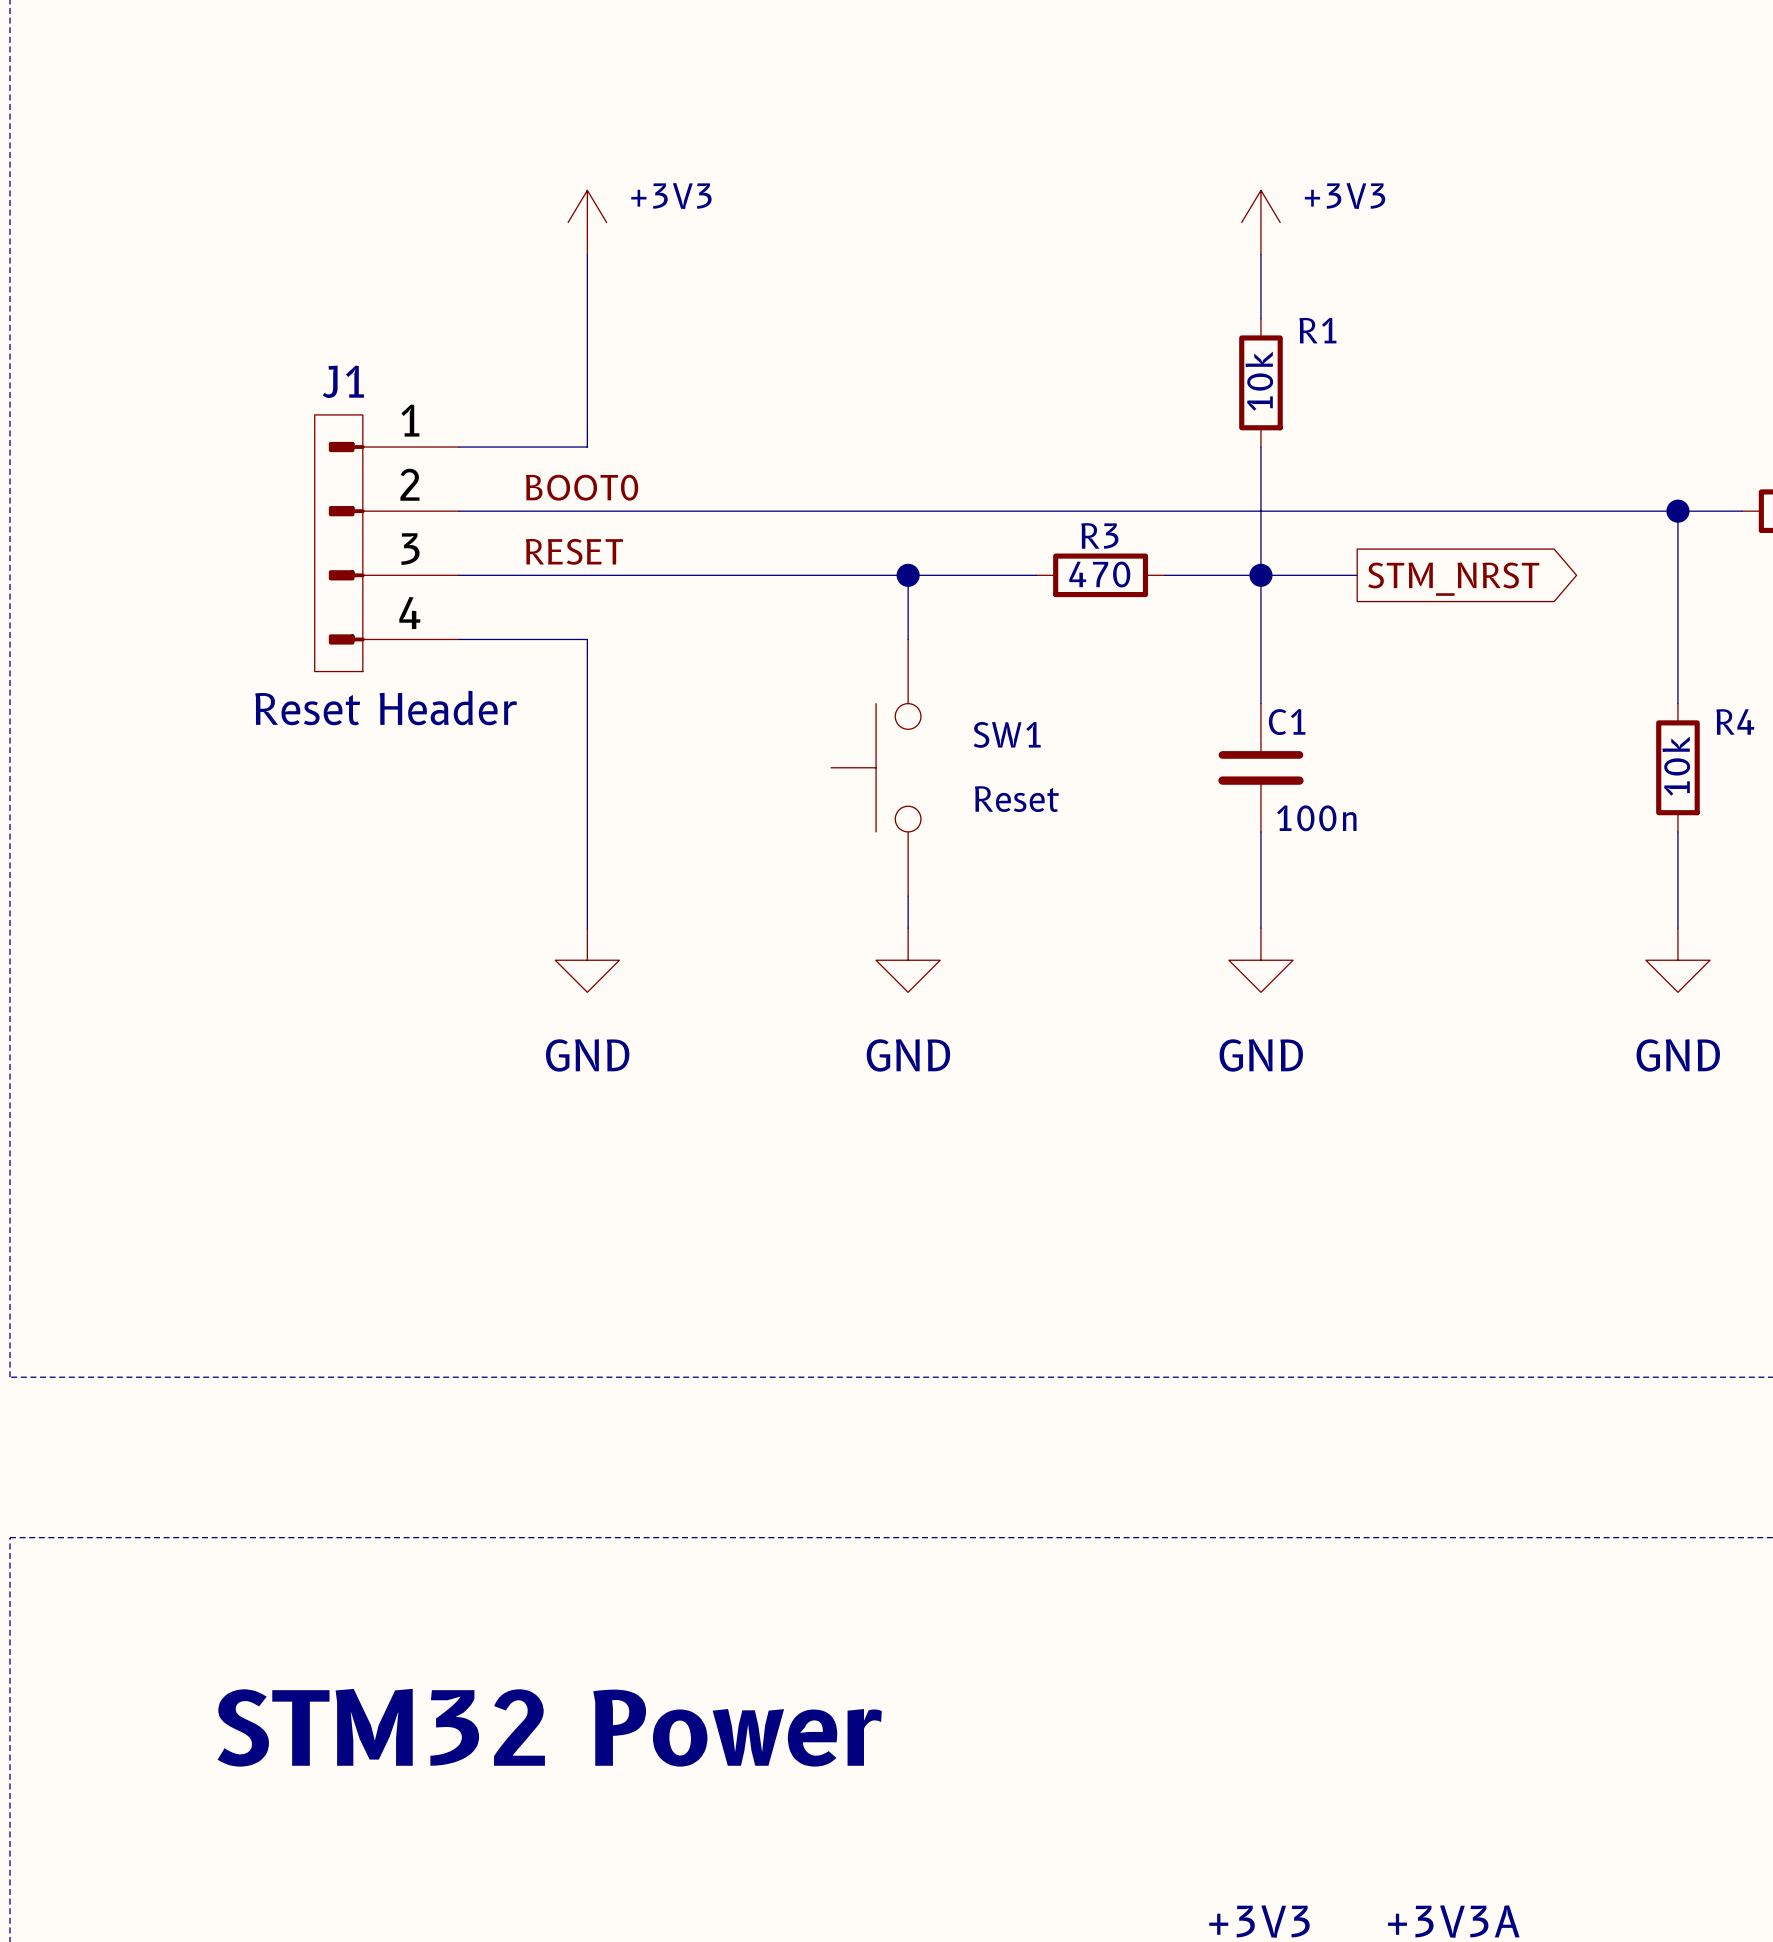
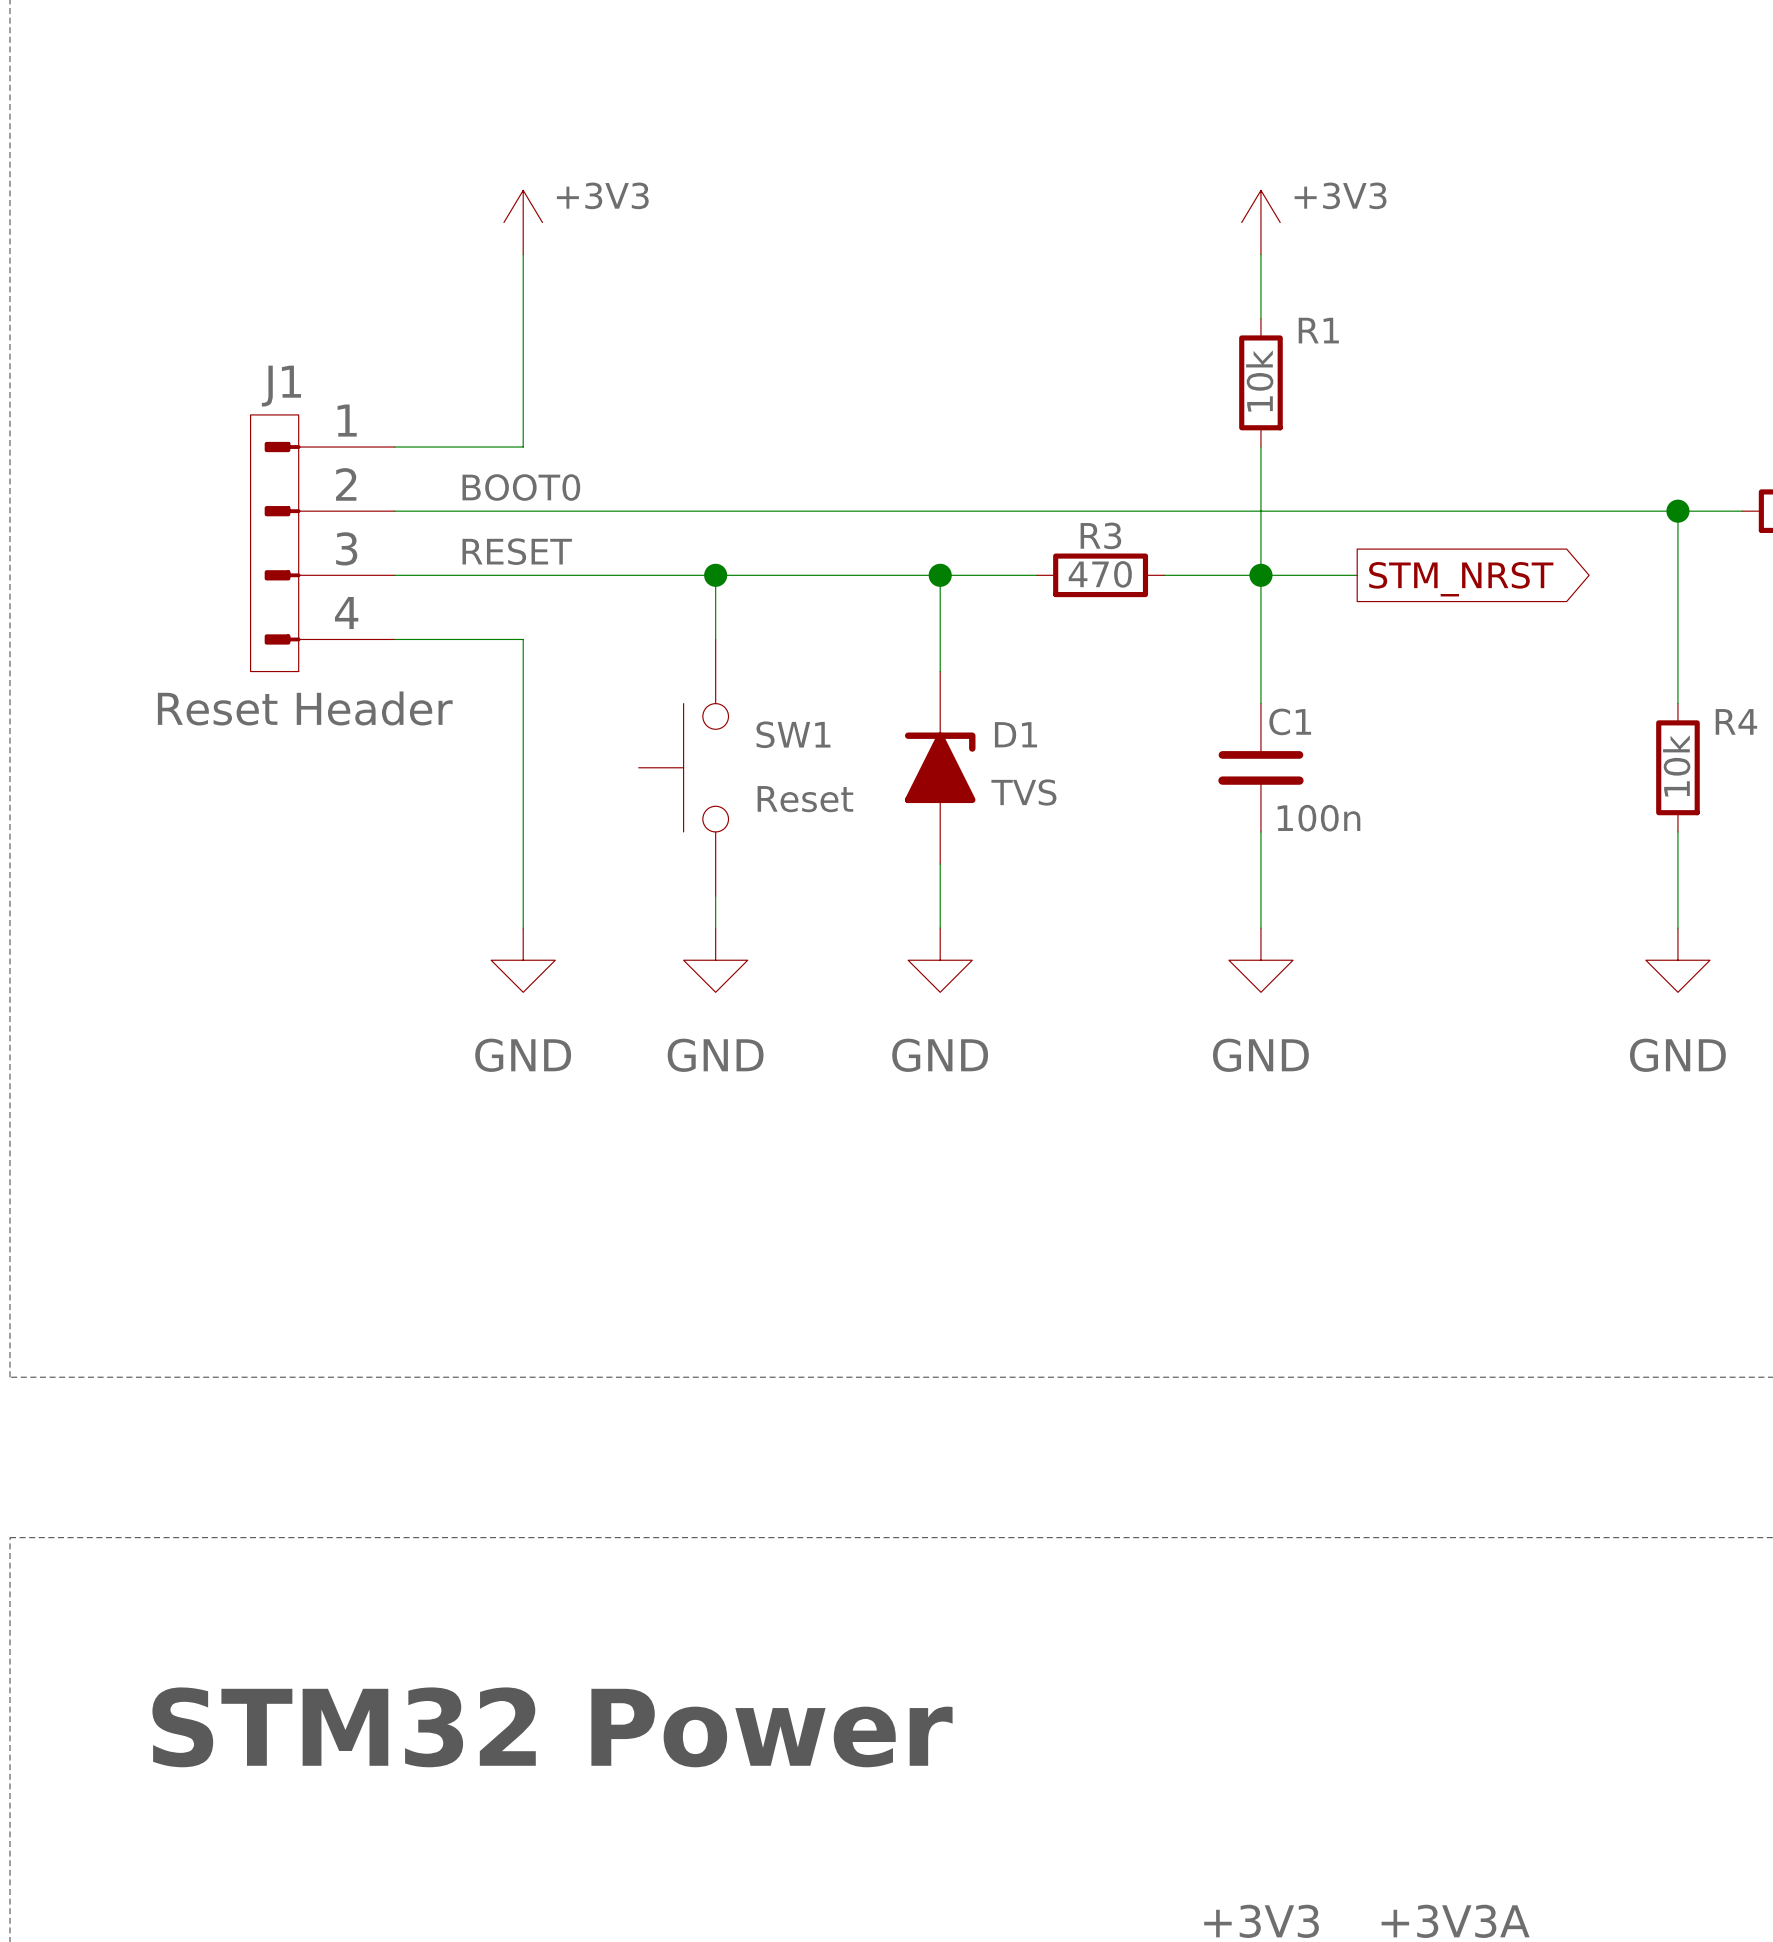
power symbol position: +3V3 (587, 222) -> +3V3 (523, 222)
wire: (587, 254) (587, 447) (523, 447) -> (523, 254) (523, 447)
label position: BOOT0 (582, 487) -> BOOT0 (521, 487)
J1 position: (386, 543) -> (322, 543)
label position: RESET (574, 551) -> RESET (517, 551)
junction: none -> (715, 575)
wire: (908, 575) (908, 639) -> (715, 575) (715, 639)
junction position: (908, 575) -> (940, 575)
wire: none -> (940, 575) (940, 671)
wire: (523, 639) (587, 639) (587, 928) -> (523, 639) (523, 928)
SW1 name position: SW1 (1007, 734) -> SW1 (793, 734)
SW1 position: (876, 767) -> (683, 767)
D1: none -> TVS (940, 767)
SW1 value position: Reset (1016, 799) -> Reset (805, 799)
wire: none -> (940, 864) (940, 928)
wire: (908, 896) (908, 928) -> (715, 896) (715, 928)
power symbol: none -> GND (523, 960)
power symbol: GND (587, 960) -> none
power symbol: none -> GND (715, 960)
power symbol position: GND (908, 960) -> GND (940, 960)

